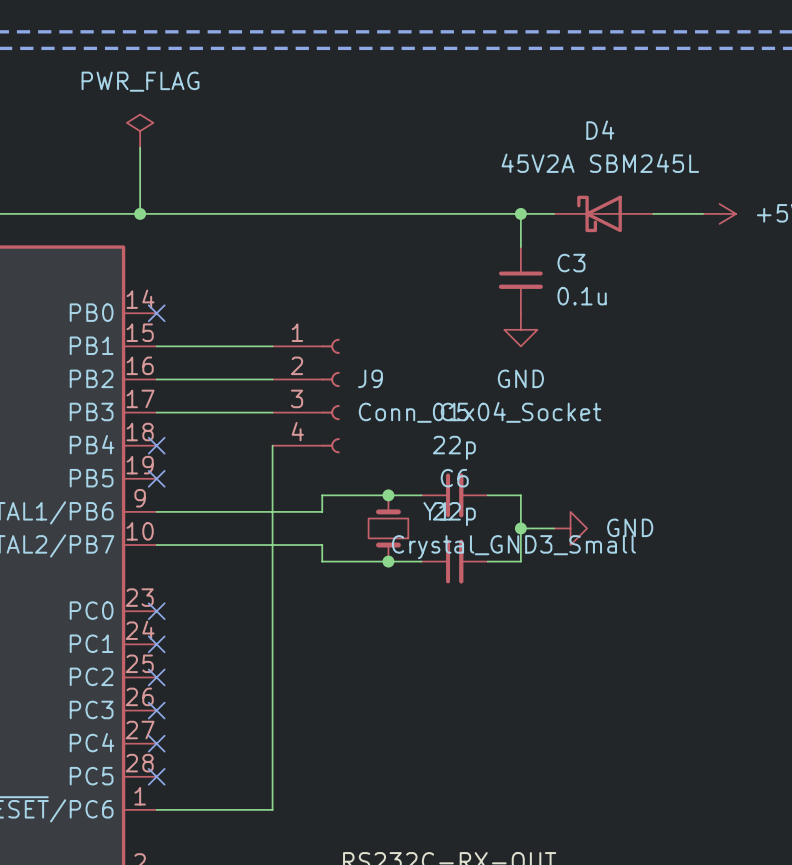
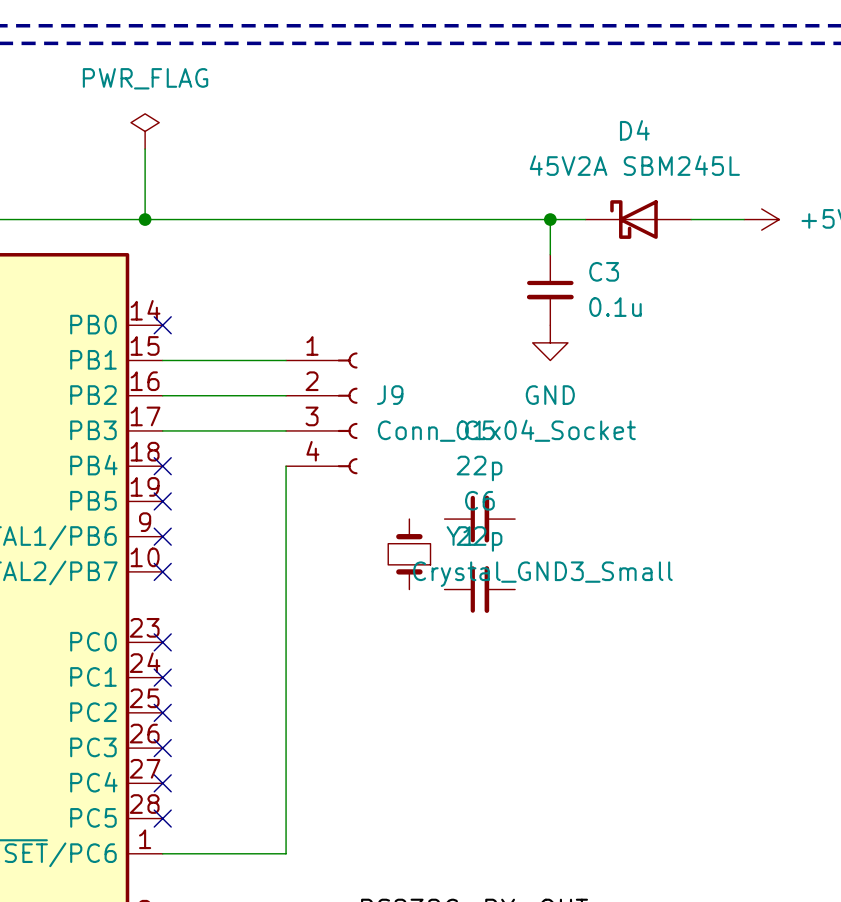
junction: (388, 495) -> none
wire: (421, 495) (322, 495) (322, 511) (156, 511) -> none
wire: (487, 495) (520, 495) (520, 561) (487, 561) -> none
no-connect mark: none -> (162, 536)
wire: (520, 528) (554, 528) -> none
junction: (520, 528) -> none
power symbol: GND (570, 528) -> none
wire: (156, 545) (322, 545) (322, 561) (421, 561) -> none
no-connect mark: none -> (162, 571)
junction: (388, 561) -> none

